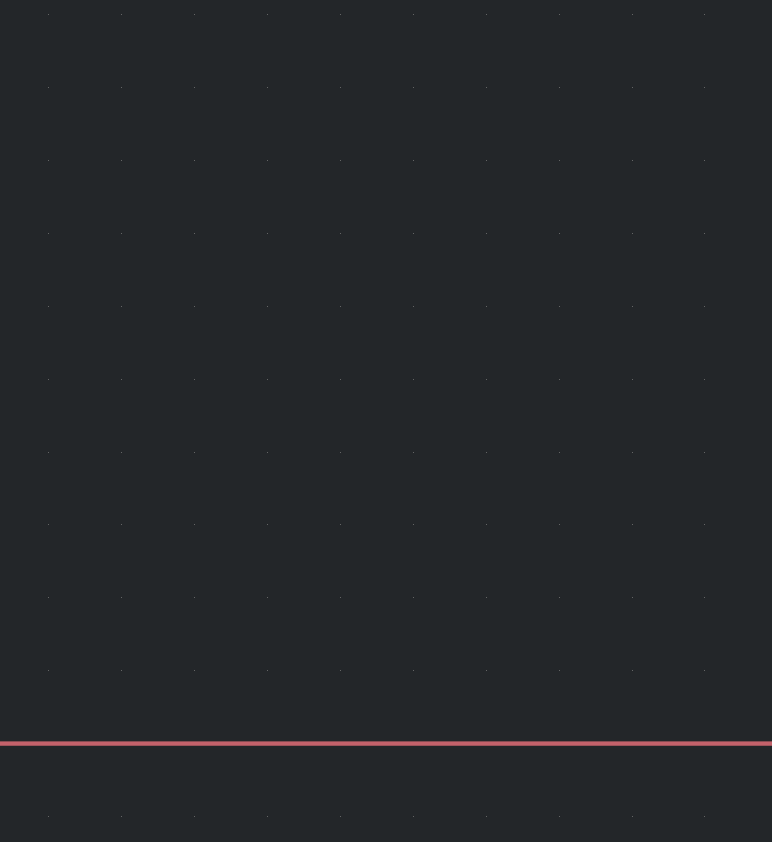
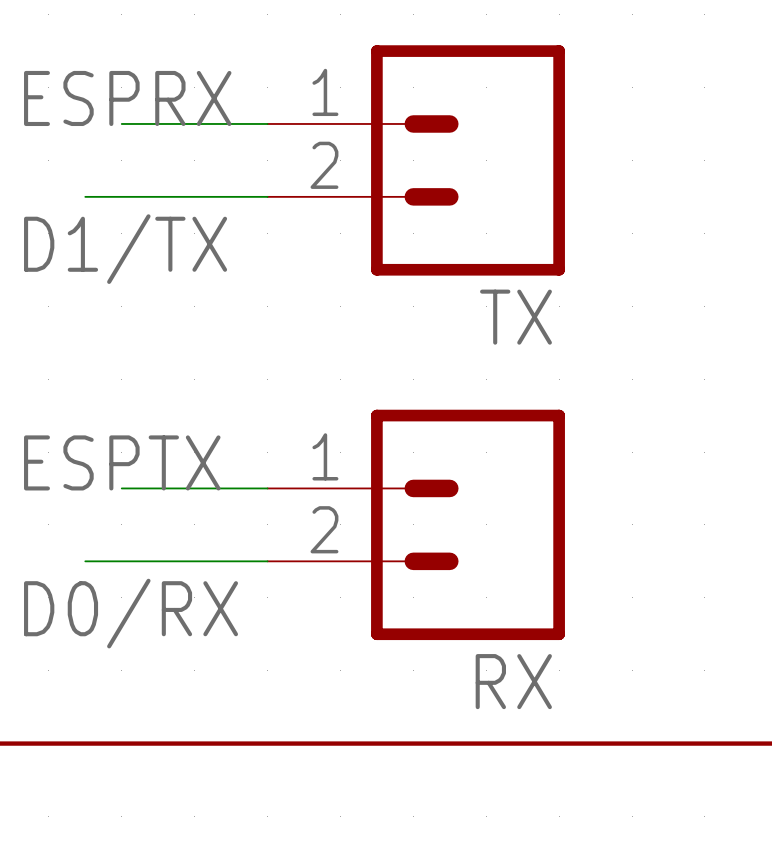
label: none -> ESPRX (127, 98)
wire: none -> (121, 123) (267, 123)
TX: none -> (416, 160)
wire: none -> (85, 196) (267, 196)
label: none -> D1/TX (125, 249)
label: none -> ESPTX (122, 462)
wire: none -> (121, 488) (267, 488)
RX: none -> (416, 524)
wire: none -> (85, 561) (267, 561)
label: none -> D0/RX (131, 613)

